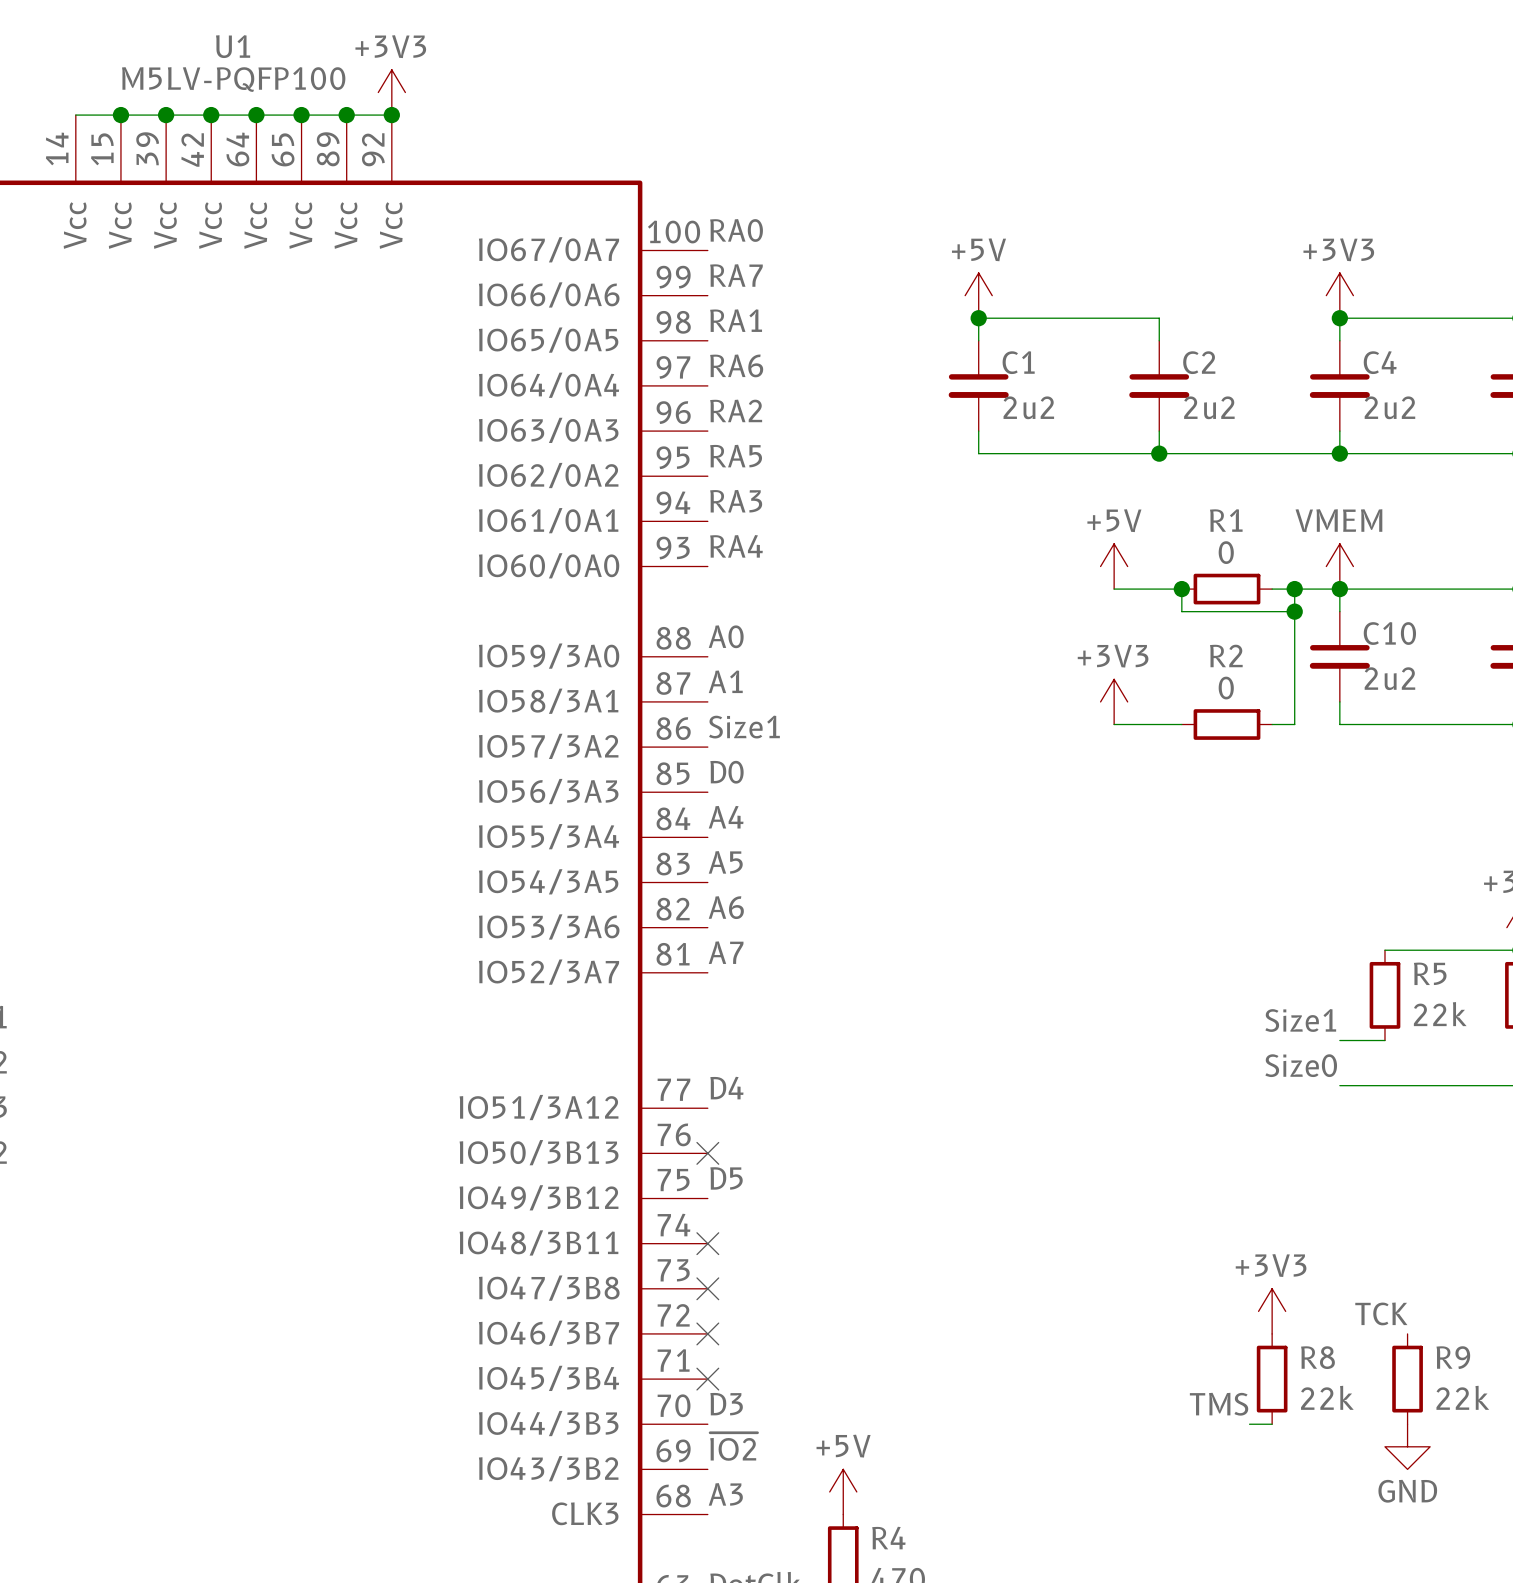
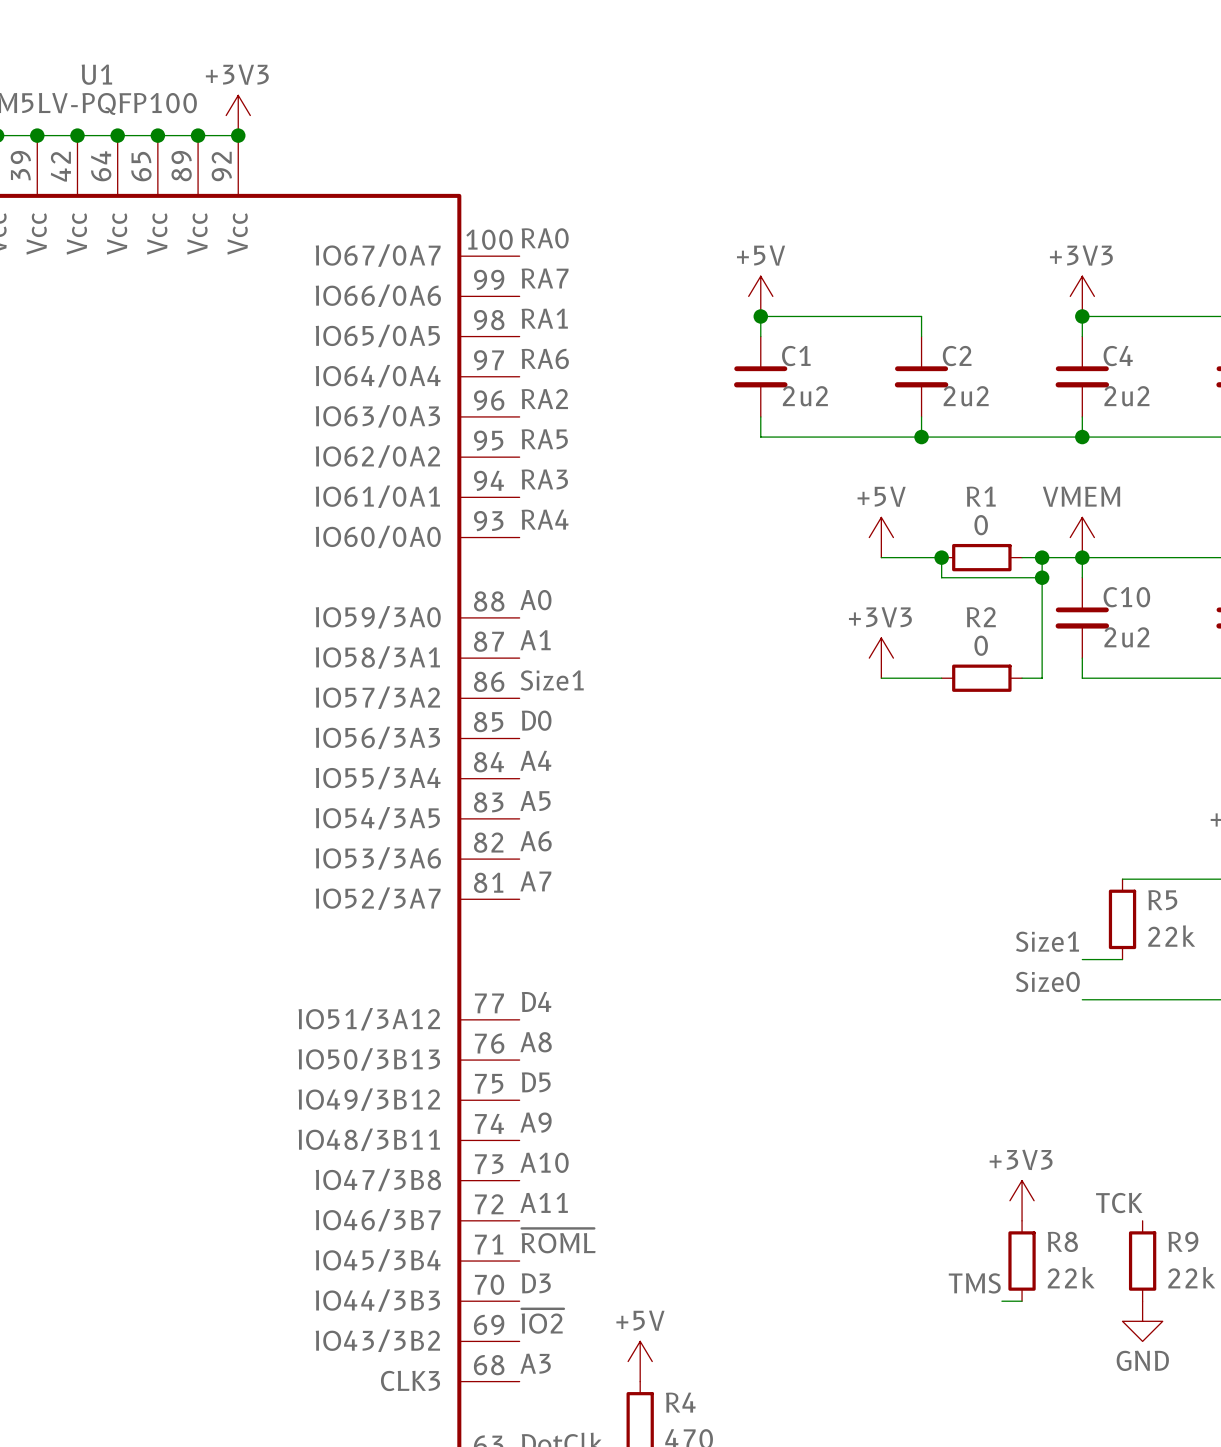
label: none -> A8 (536, 1042)
no-connect mark: (707, 1153) -> none
label: none -> A9 (536, 1122)
no-connect mark: (707, 1243) -> none
label: none -> A10 (544, 1162)
no-connect mark: (707, 1288) -> none
label: none -> A11 (544, 1202)
no-connect mark: (707, 1333) -> none
label: none -> ~{ROML} (558, 1240)
no-connect mark: (707, 1379) -> none

